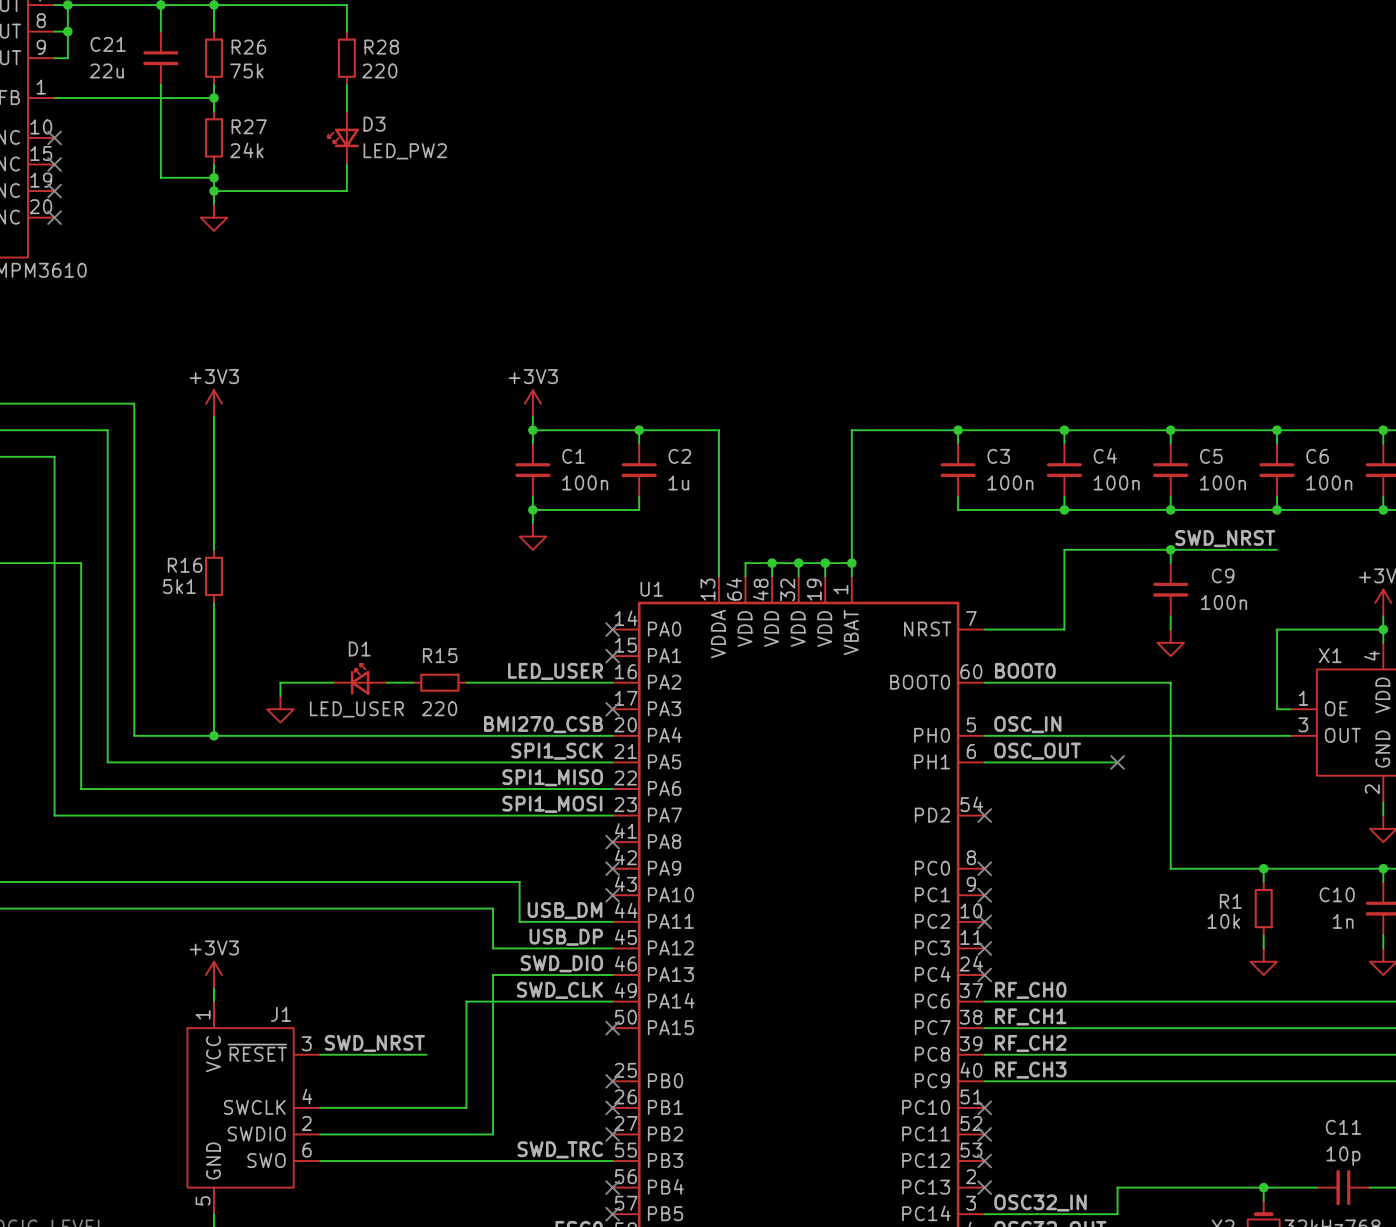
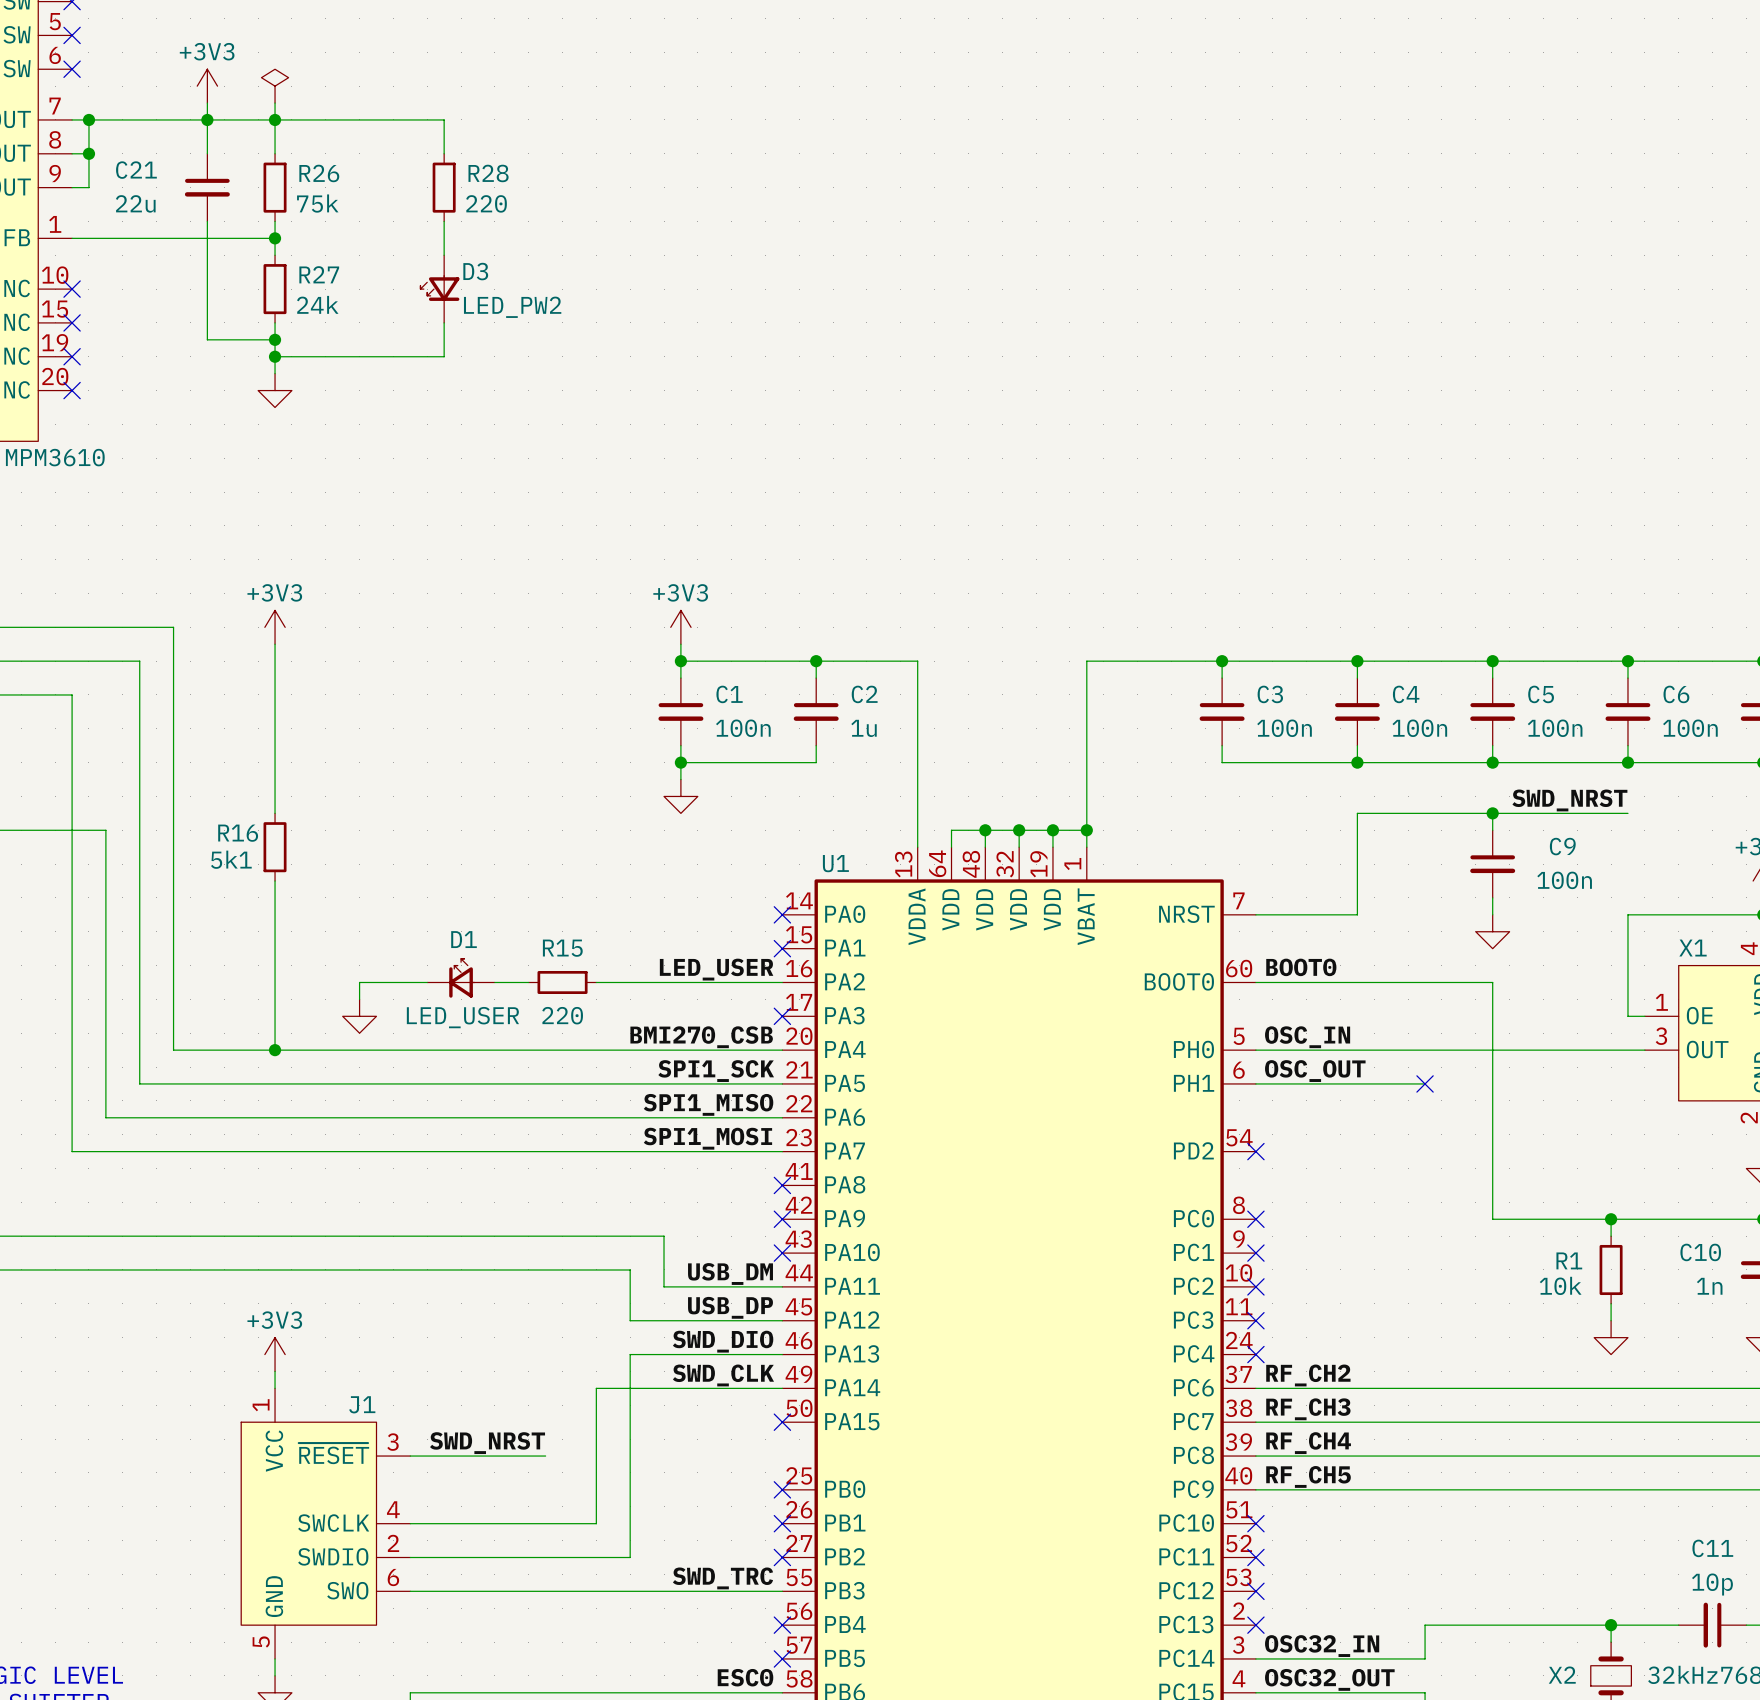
label: RF_CH0 (1030, 990) -> RF_CH2 (1308, 1375)
label: RF_CH1 (1030, 1016) -> RF_CH3 (1308, 1409)
label: RF_CH2 (1030, 1043) -> RF_CH4 (1308, 1443)
label: RF_CH3 (1030, 1070) -> RF_CH5 (1308, 1476)

